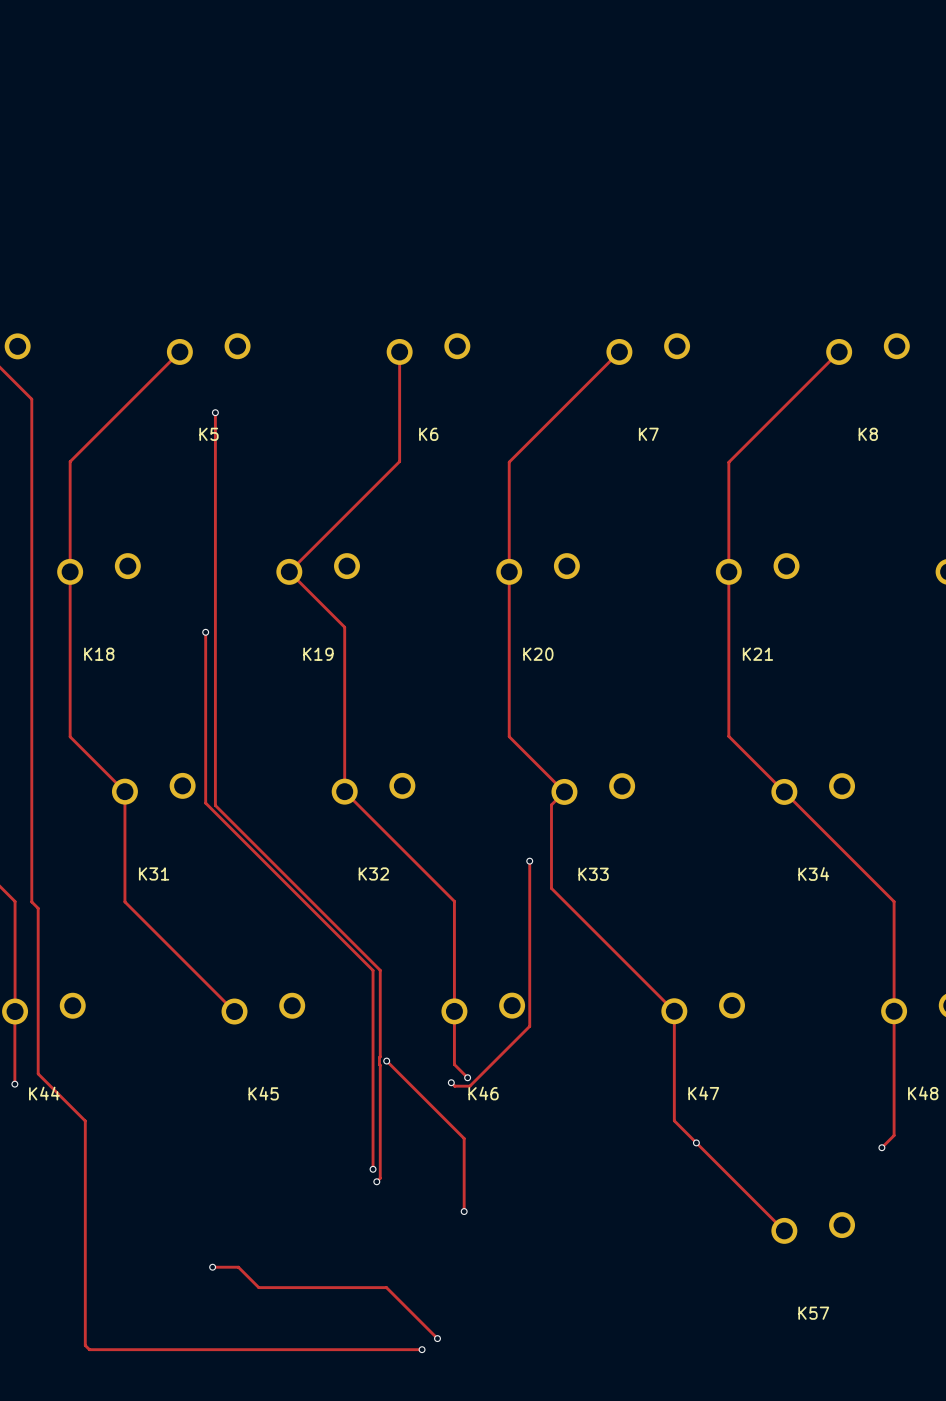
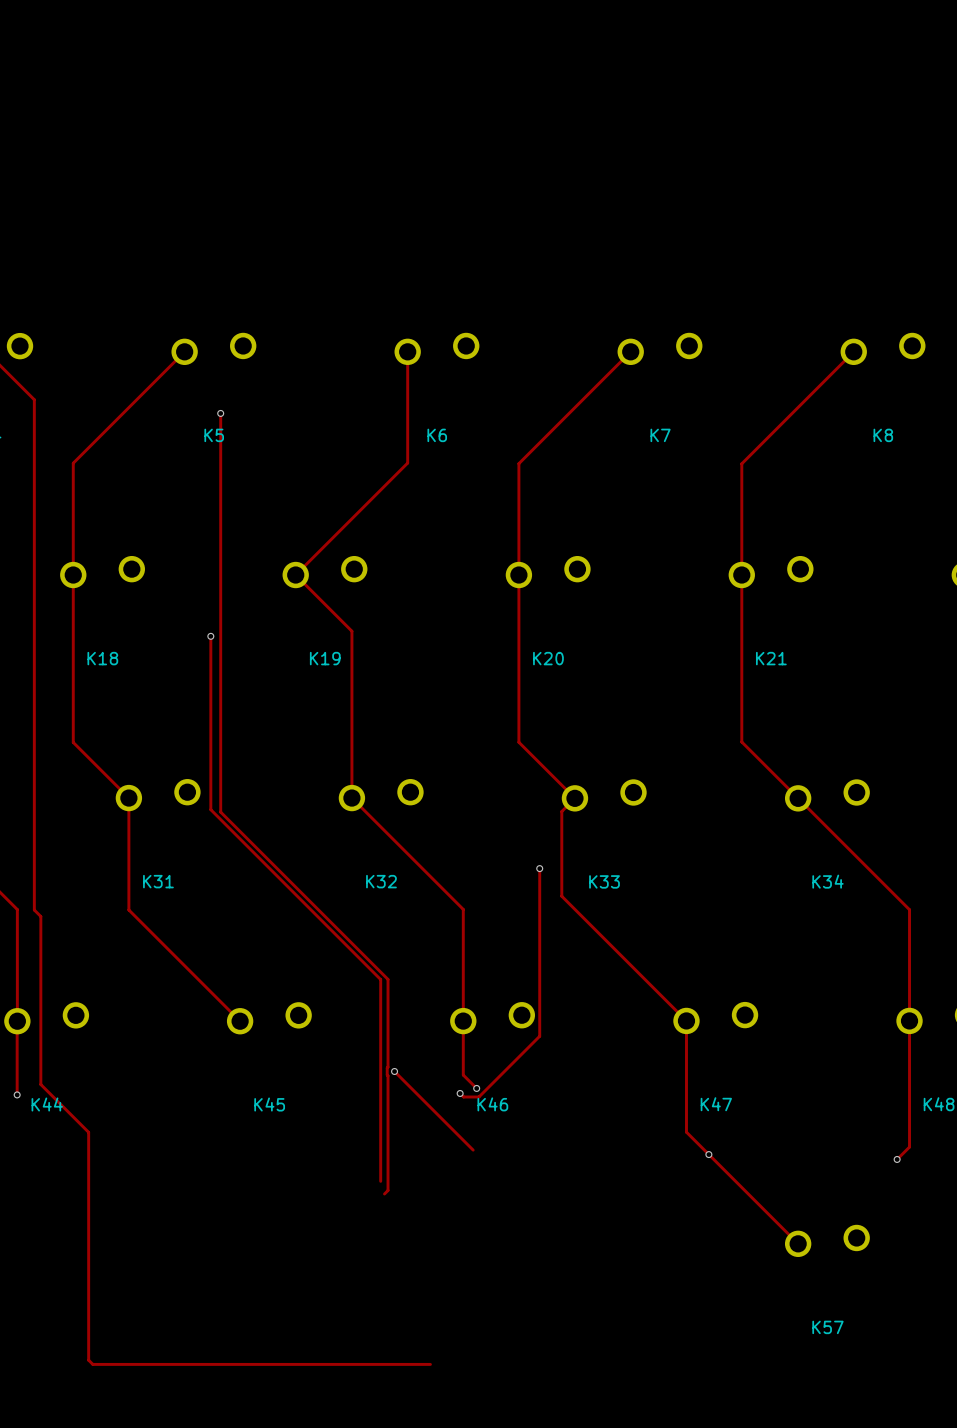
track: (464, 1138) (464, 1211) -> none
via: (373, 1169) -> none
via: (376, 1181) -> none
via: (464, 1211) -> none
track: (212, 1267) (238, 1267) (258, 1287) (386, 1287) (437, 1338) -> none
via: (212, 1267) -> none
via: (437, 1338) -> none
via: (422, 1349) -> none

